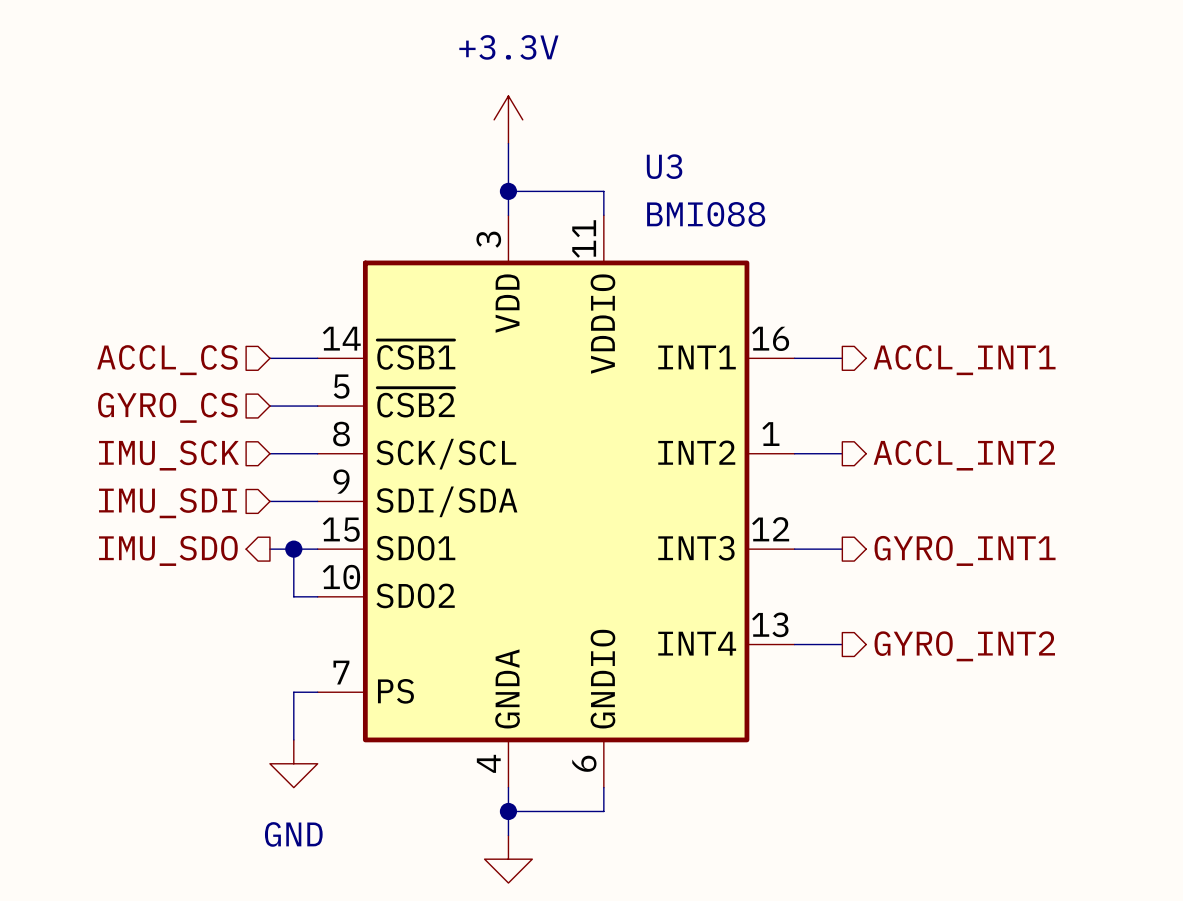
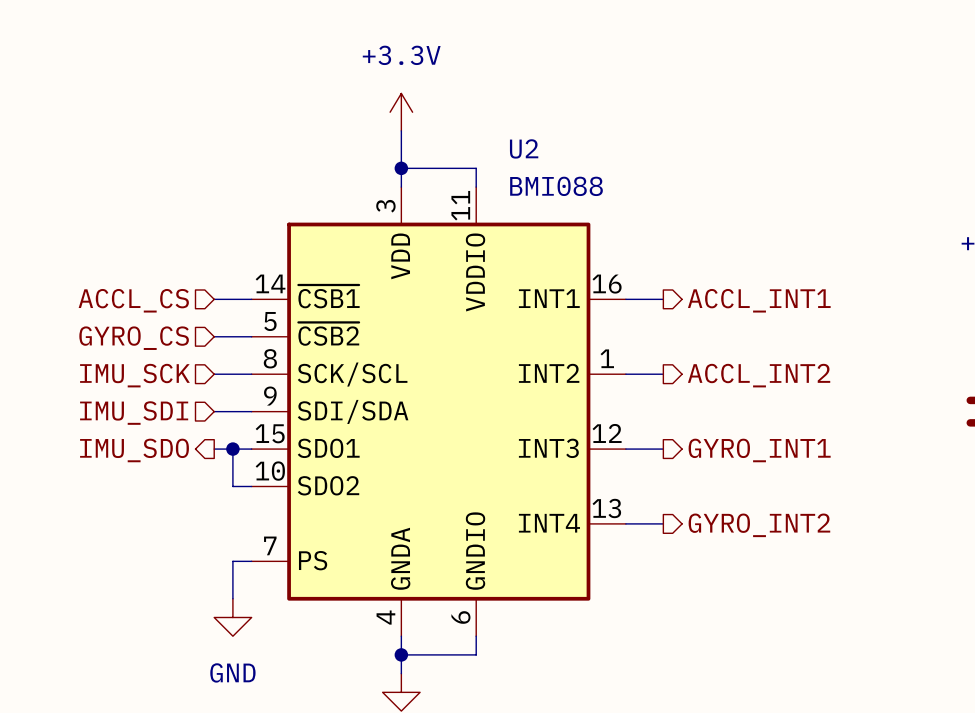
U3 name: U3 (664, 166) -> U2 (524, 148)

